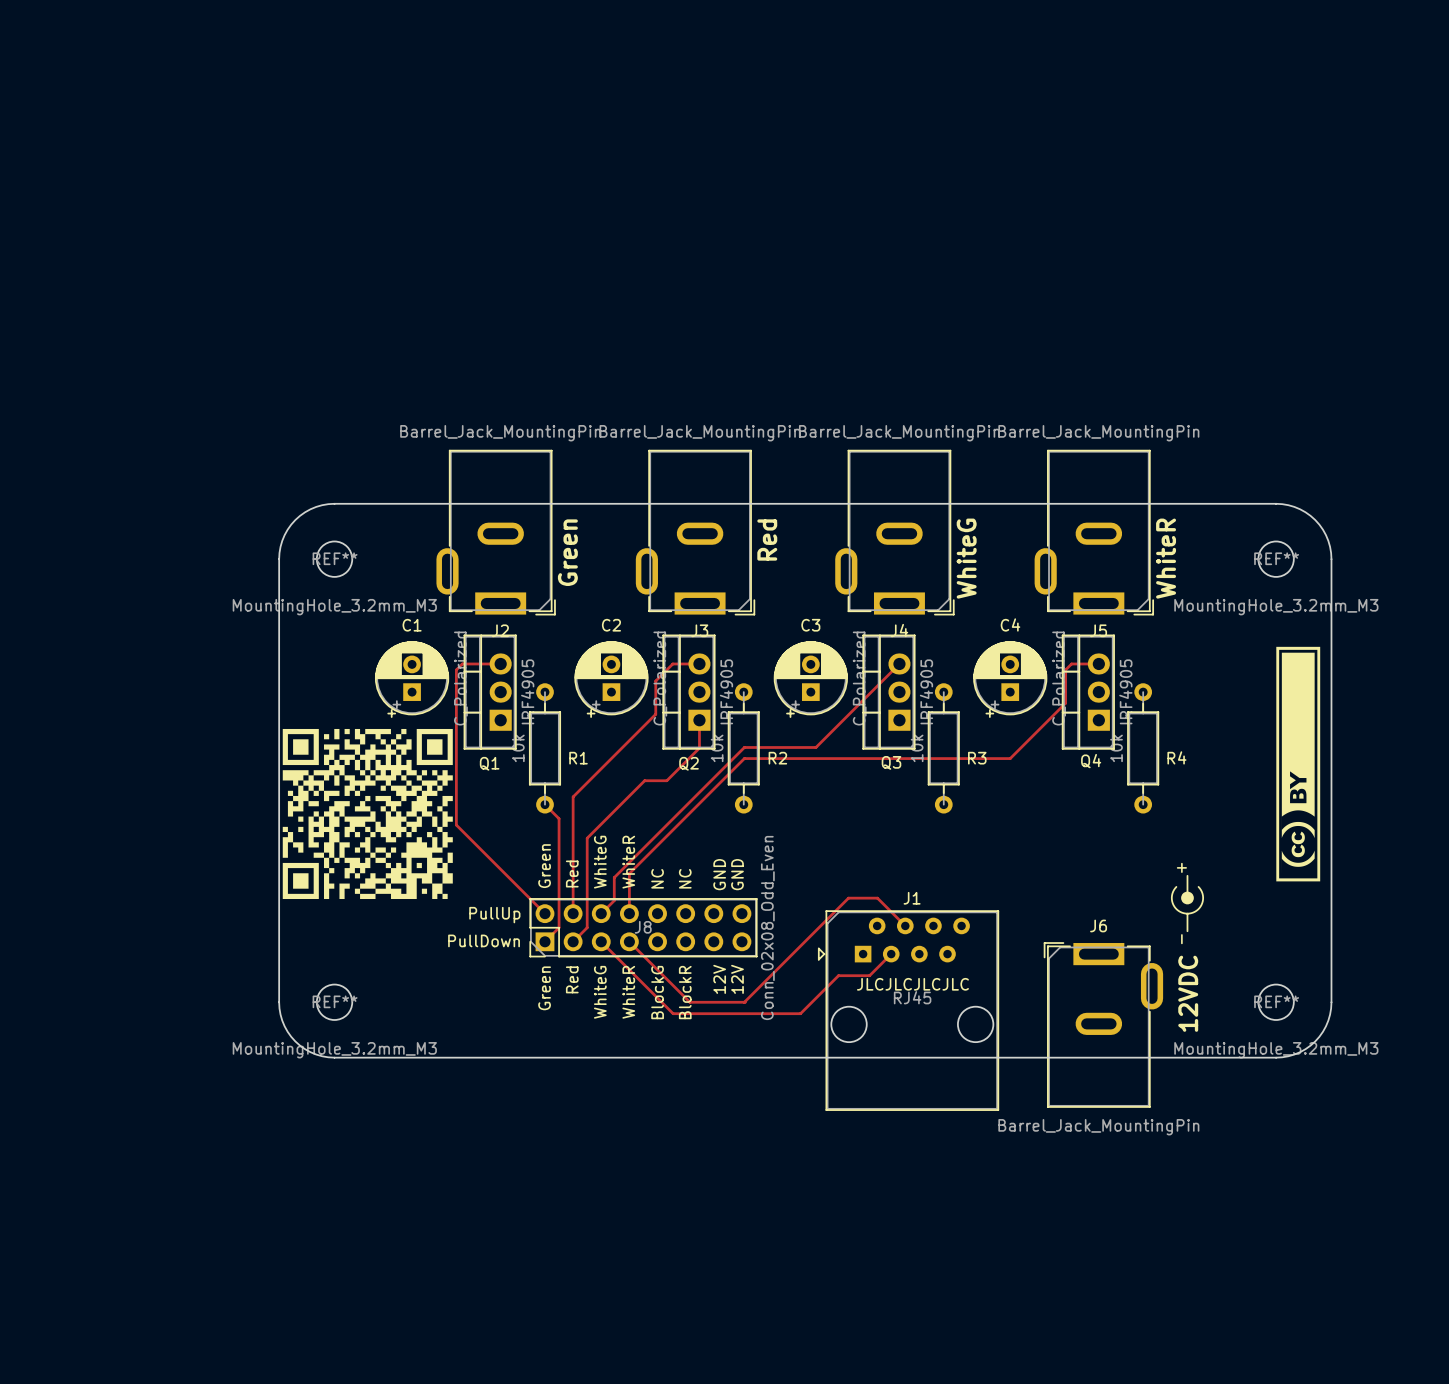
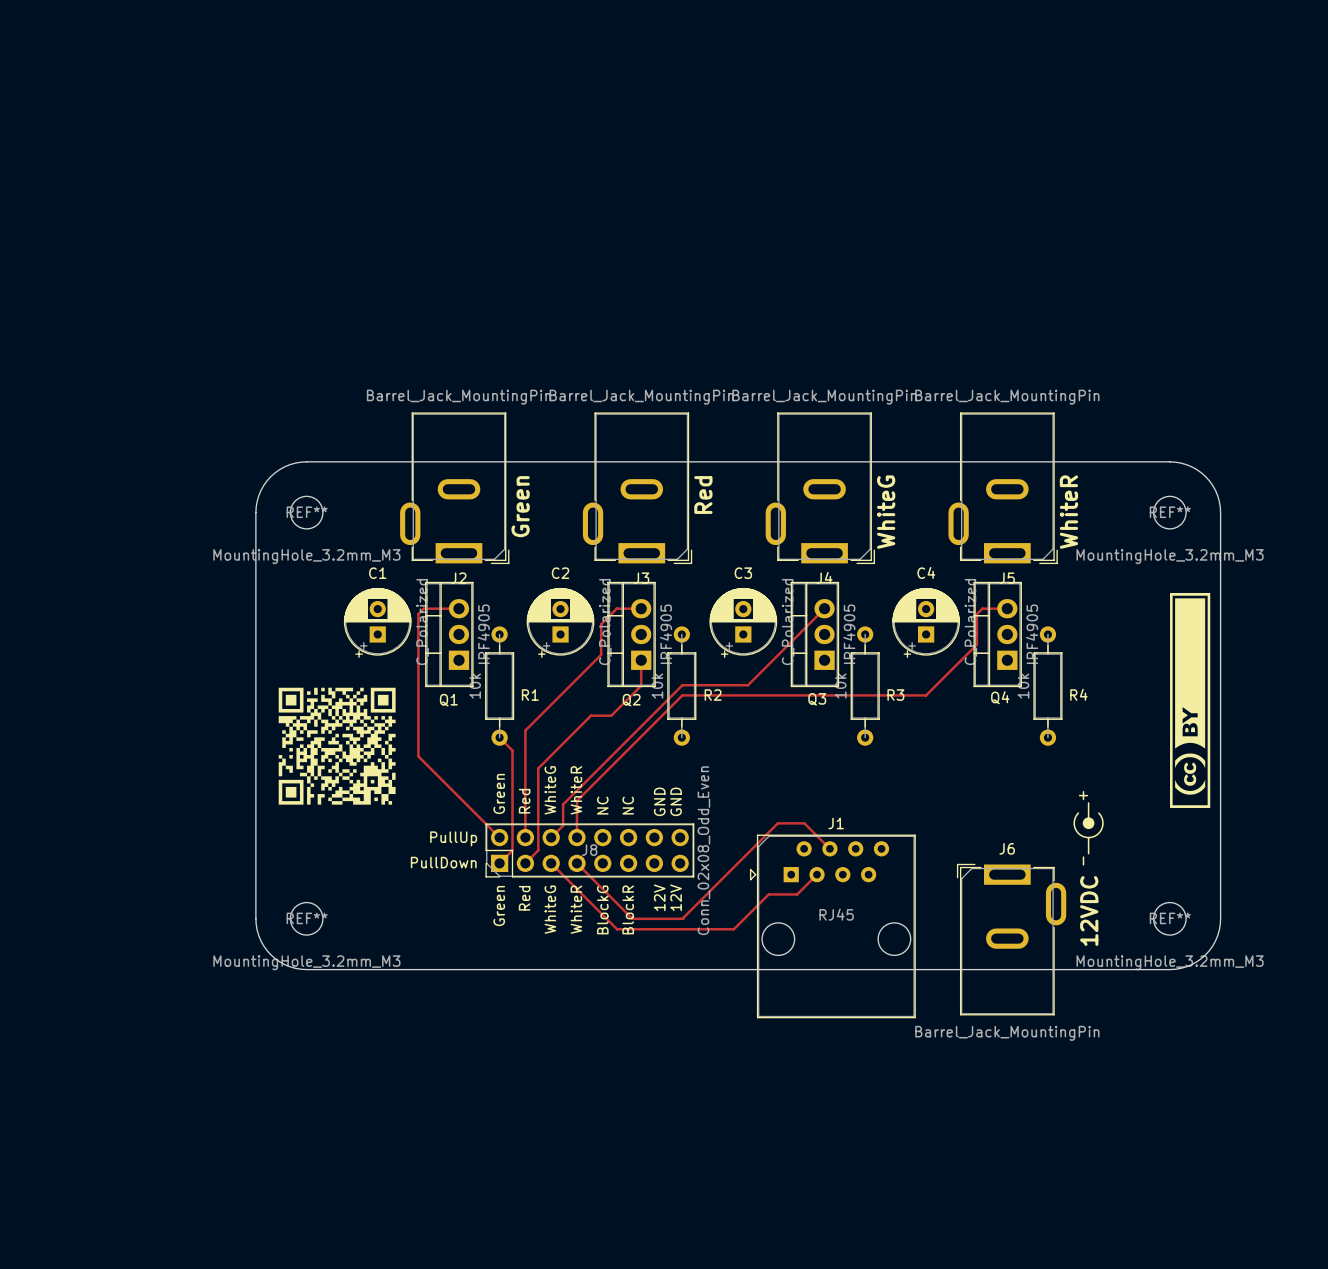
drawing shape: [282, 728, 453, 900] -> [278, 687, 396, 805]
text: JLCJLCJLCJLC (912, 984) -> none

